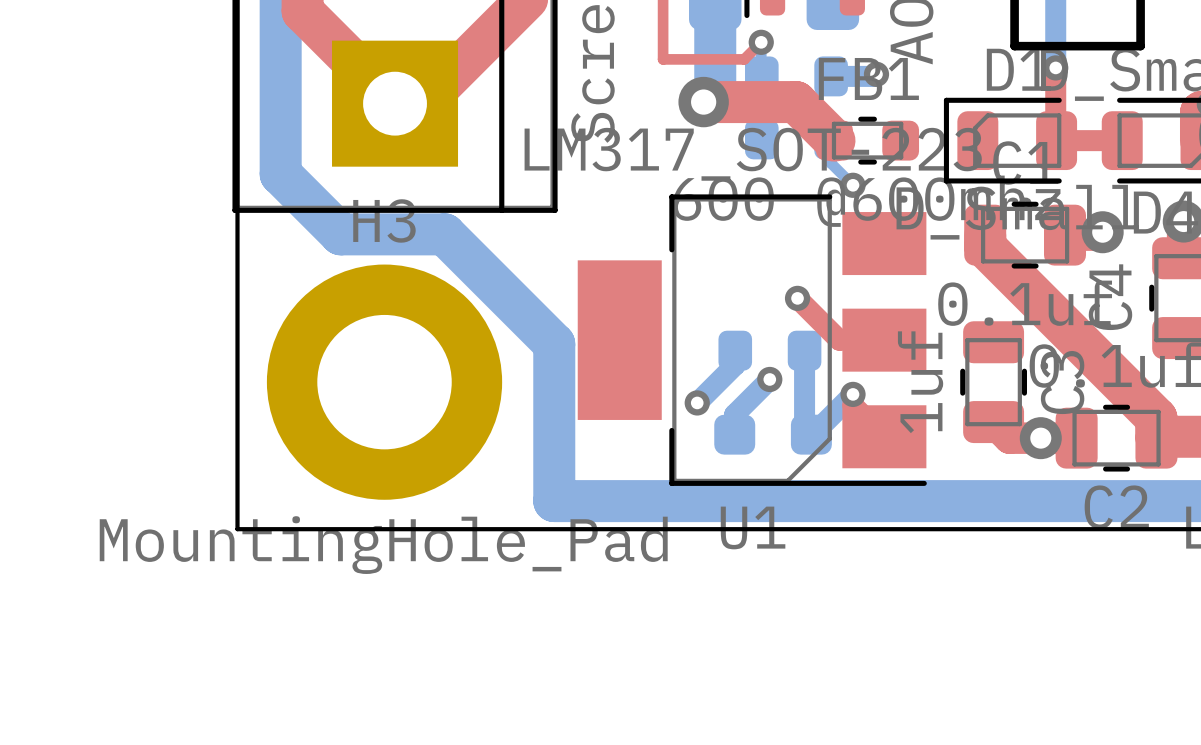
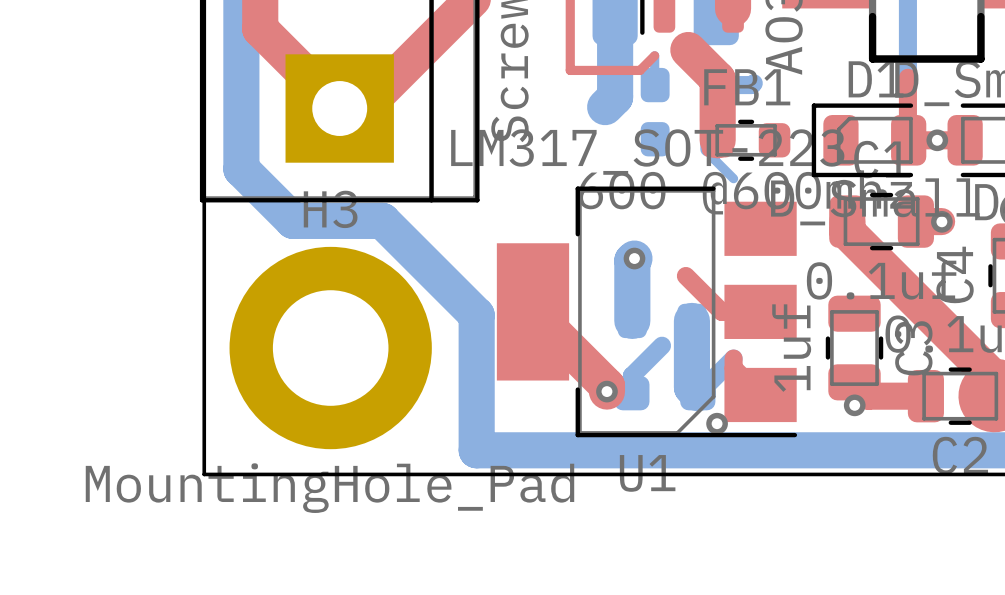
via: (761, 42) -> none
via position: (1055, 67) -> (937, 140)
via: (876, 74) -> none
top track: (703, 102) (795, 102) (834, 140) -> (688, 49) (717, 79) (717, 140)
via: (703, 102) -> none
via: (853, 185) -> none
via size: [1081, 211, 1124, 254] -> [931, 210, 953, 233]
via: none -> (634, 258)
via: (797, 298) -> none
top track: none -> (532, 311) (606, 385) (606, 391)
bottom track: (735, 350) (735, 364) (697, 402) -> (632, 320) (632, 260) (634, 258)
bottom track width: thin (804, 350) (804, 427) (811, 434) -> thick (691, 320) (691, 387) (697, 393)
via: (769, 379) -> none
via: (853, 394) -> none
via position: (697, 402) -> (606, 391)
via: (1040, 438) -> none
via: none -> (854, 405)
via: none -> (717, 423)

